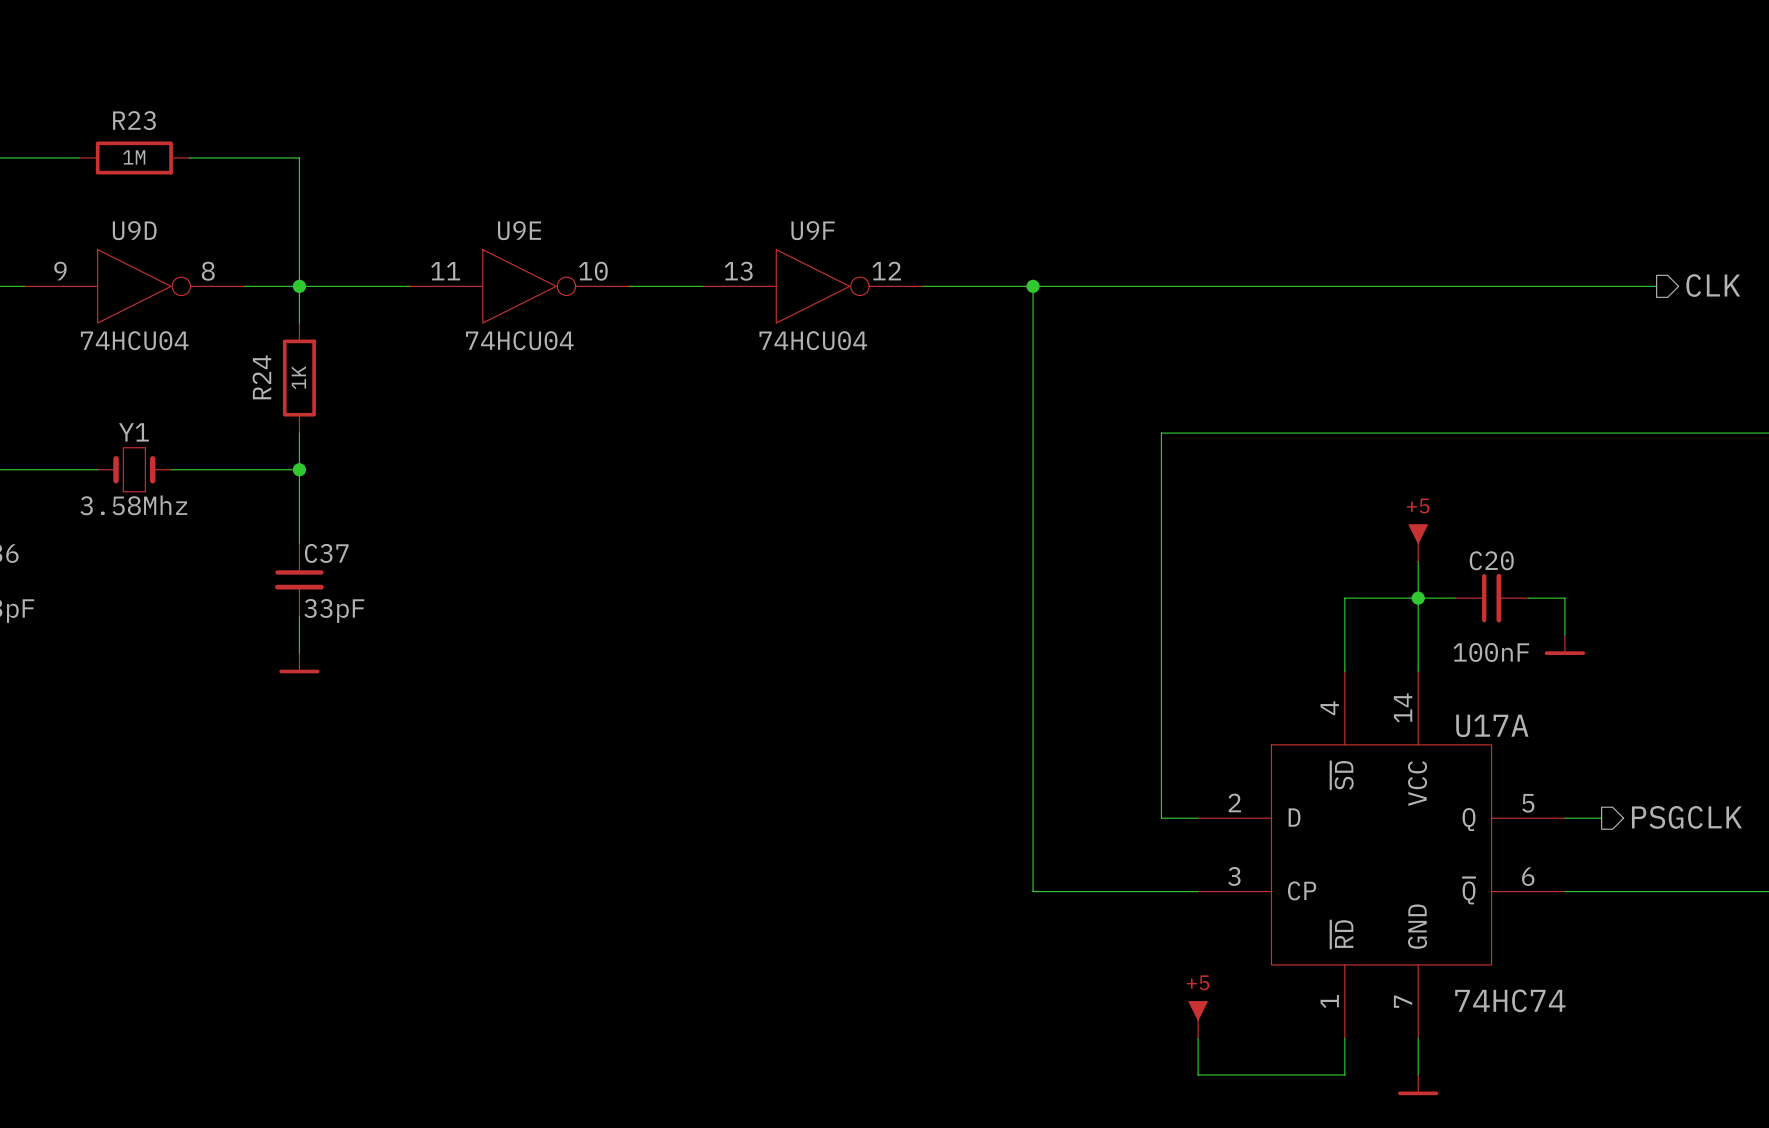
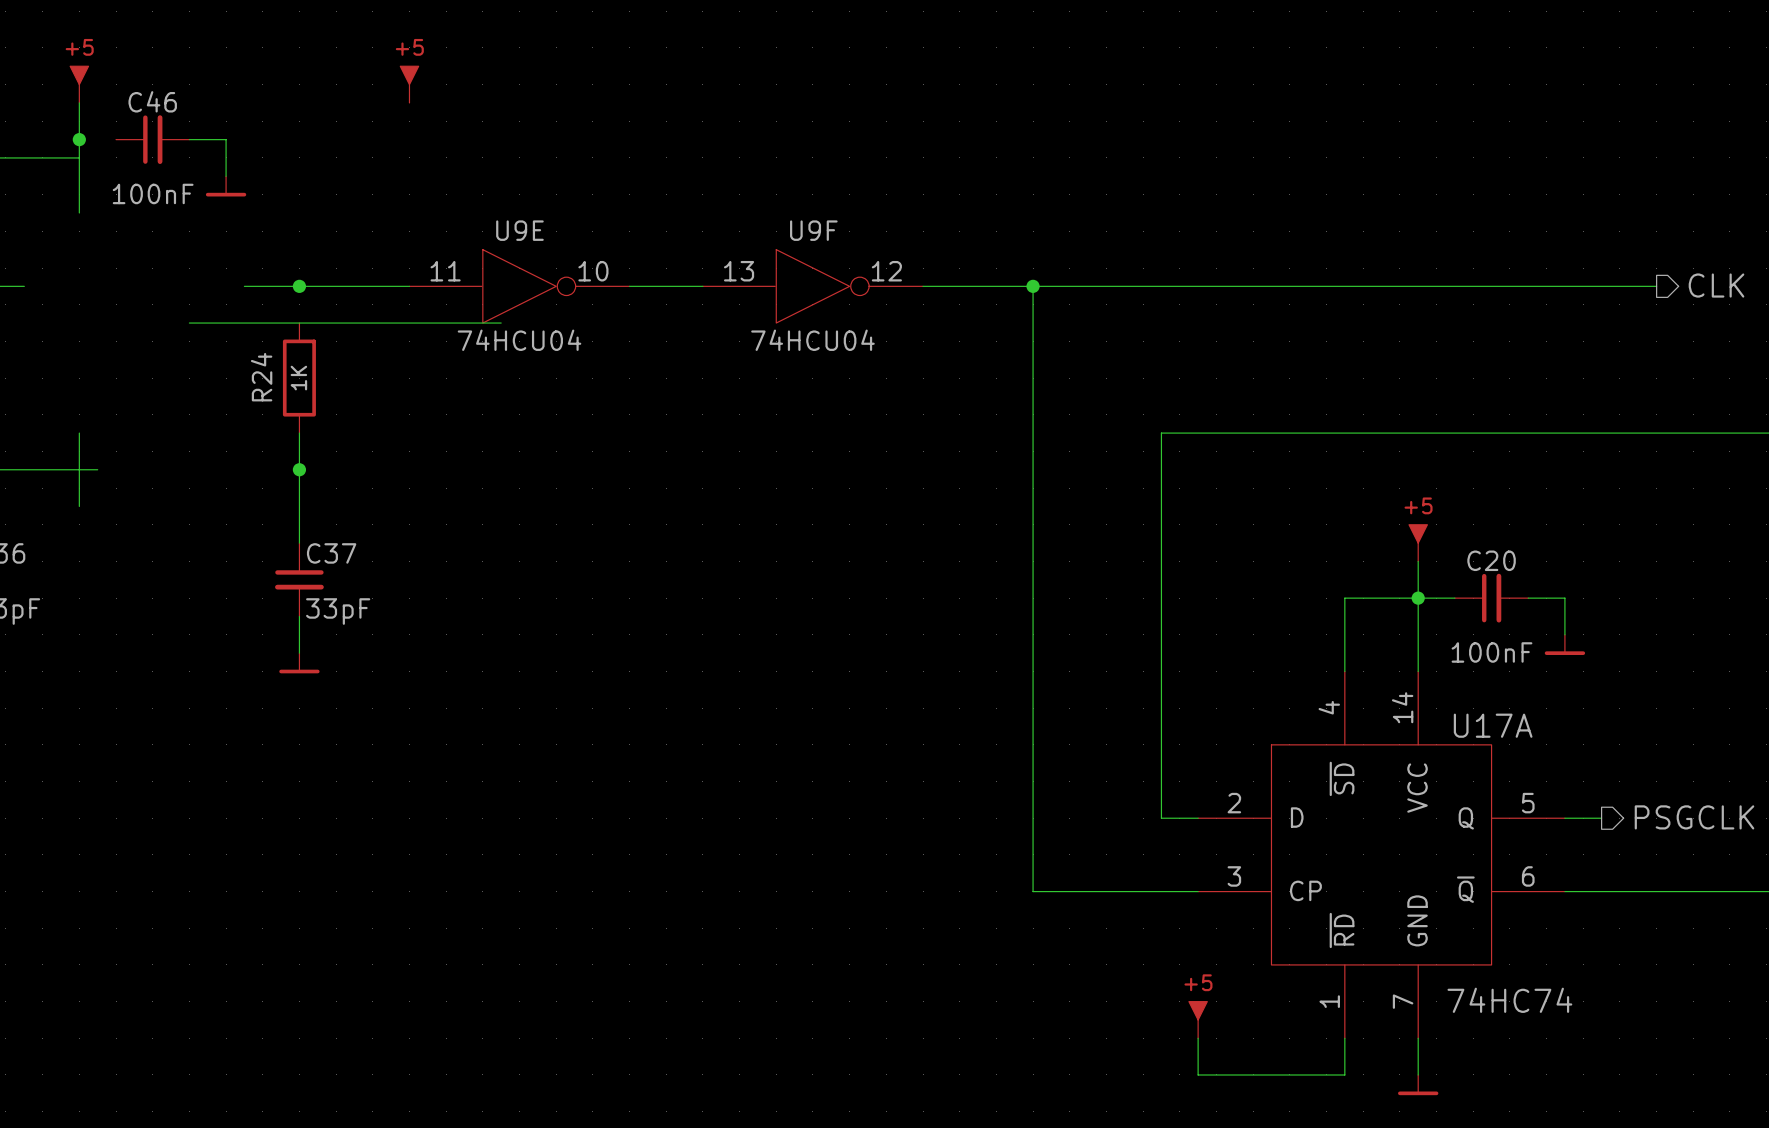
power symbol: none -> (79, 84)
power symbol: none -> (409, 84)
wire: none -> (79, 102) (79, 212)
junction: none -> (79, 139)
C46: none -> 100nF (152, 139)
wire: none -> (189, 139) (226, 139) (226, 176)
R23: 1M (134, 157) -> none
wire: (189, 157) (299, 157) (299, 323) -> none
power symbol: none -> (226, 186)
U9D: 74HCU04 (134, 286) -> none
wire: none -> (189, 323) (501, 323)
wire: none -> (79, 433) (79, 506)
Y1: 3.58Mhz (134, 469) -> none
wire: (171, 469) (299, 469) -> none

